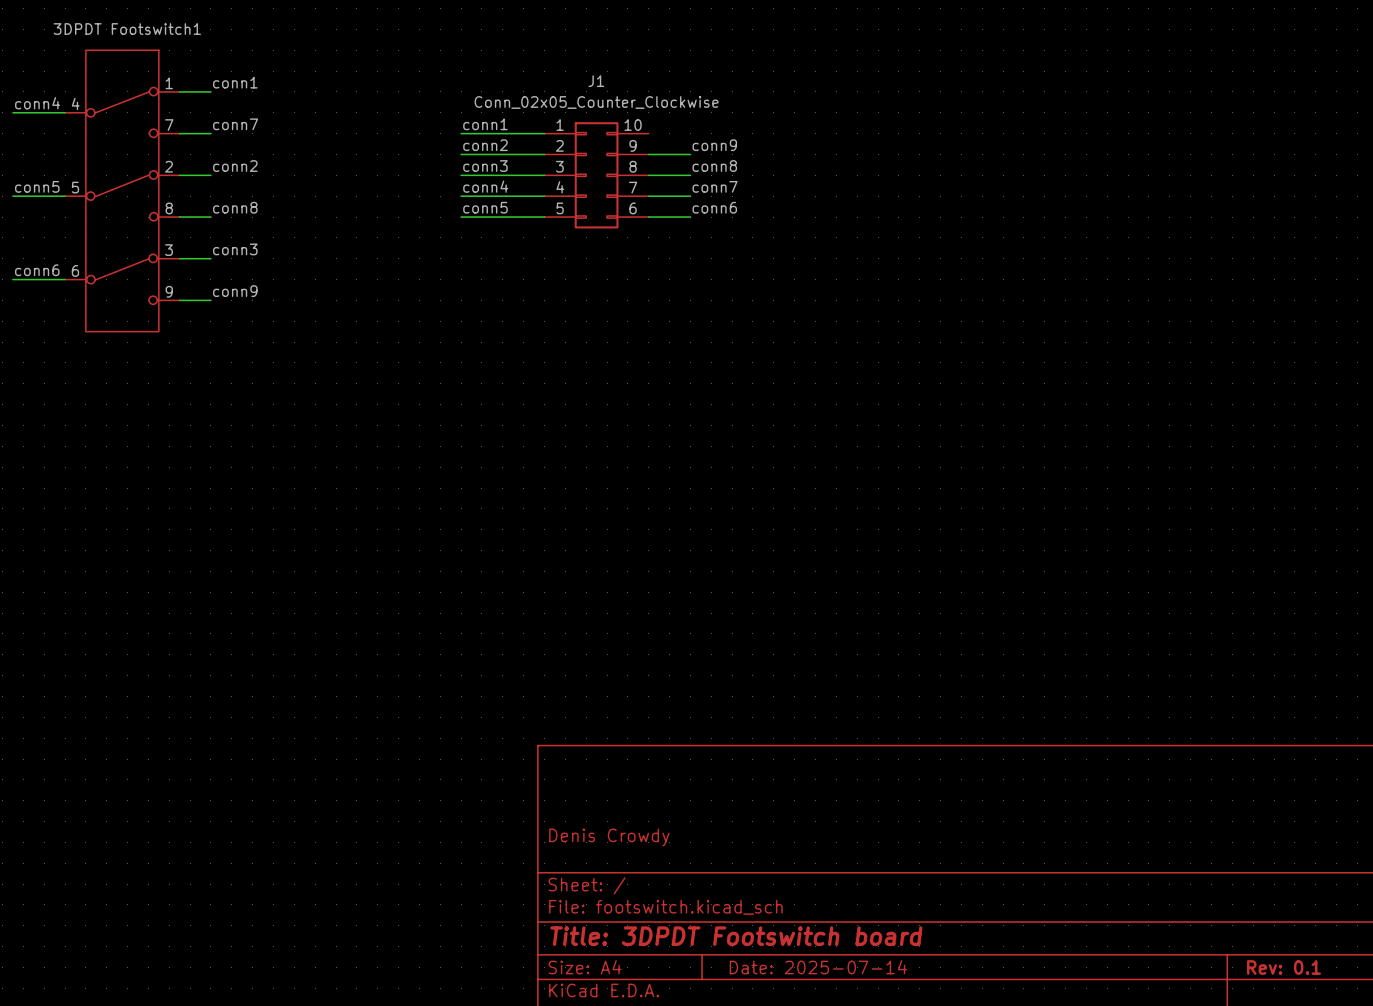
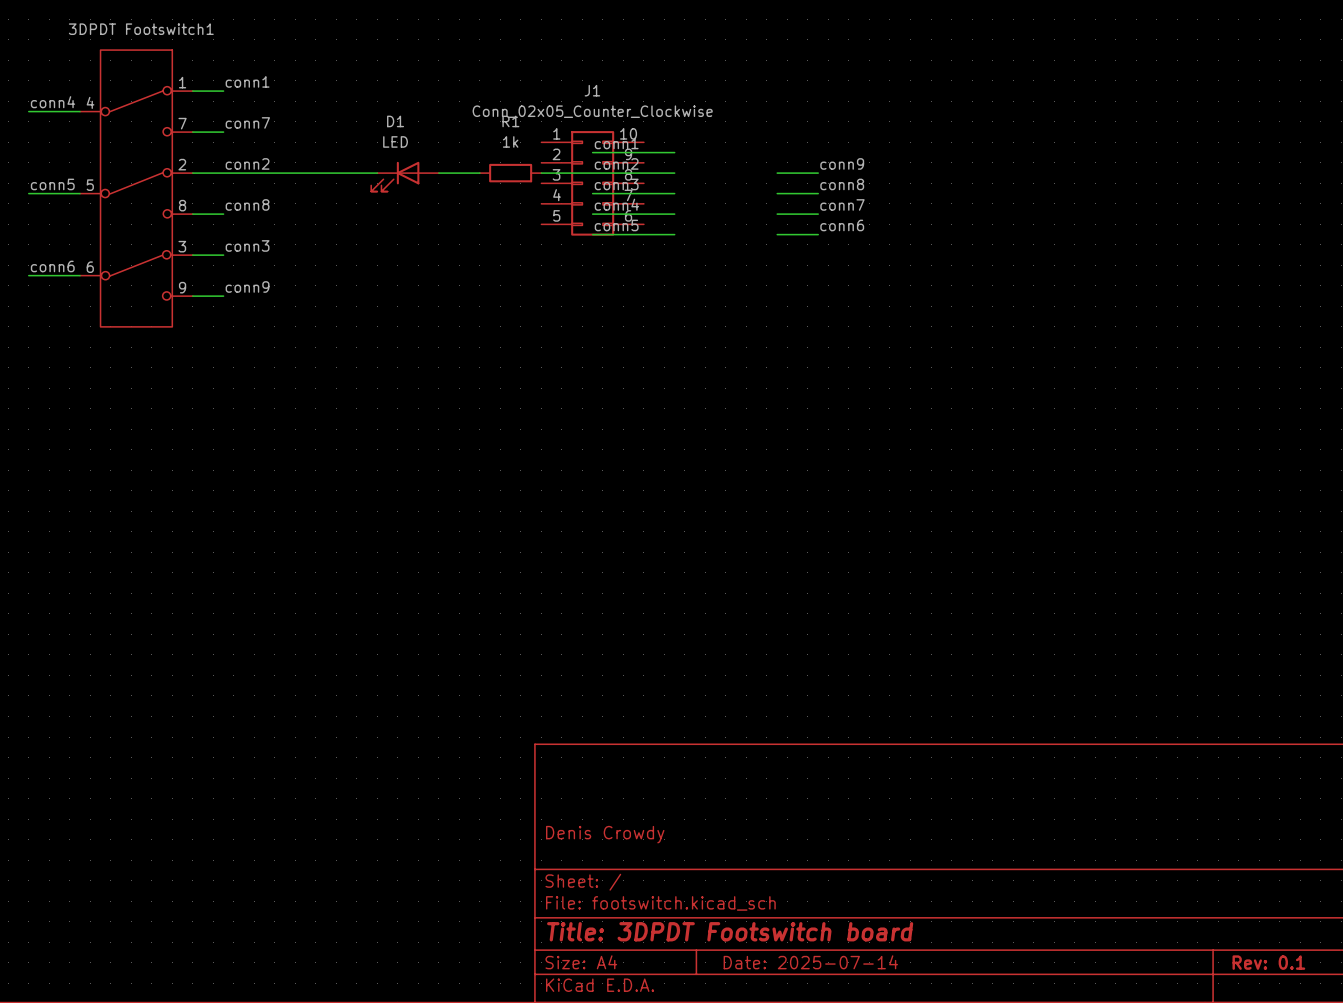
label position: conn1 (235, 82) -> conn1 (247, 81)
wire: (179, 91) (210, 91) -> (192, 91) (223, 91)
label position: conn4 (37, 103) -> conn4 (53, 102)
wire: (12, 112) (65, 112) -> (28, 111) (80, 111)
label position: conn7 (235, 124) -> conn7 (247, 122)
label: conn1 (485, 124) -> none
wire: (179, 133) (210, 133) -> (192, 132) (223, 132)
wire: (461, 133) (544, 133) -> (592, 152) (674, 152)
label: none -> conn1 (616, 143)
label: conn2 (485, 145) -> none
label position: conn9 (714, 145) -> conn9 (842, 163)
wire: (461, 154) (544, 154) -> none
wire: (648, 154) (690, 154) -> (777, 173) (818, 173)
label: none -> conn2 (616, 163)
wire: none -> (192, 173) (377, 173)
wire: none -> (438, 173) (479, 173)
R1: none -> 1k (510, 173)
wire: none -> (541, 173) (674, 173)
label position: conn2 (235, 166) -> conn2 (247, 163)
label: conn3 (485, 166) -> none
label position: conn8 (714, 166) -> conn8 (842, 184)
D1: none -> LED (405, 176)
wire: (179, 175) (210, 175) -> none
wire: (461, 175) (544, 175) -> (592, 193) (674, 193)
wire: (648, 175) (690, 175) -> (777, 193) (818, 193)
label: none -> conn3 (616, 184)
label position: conn5 (37, 186) -> conn5 (52, 184)
label position: conn4 (485, 186) -> conn4 (616, 204)
label position: conn7 (715, 186) -> conn7 (842, 204)
3DPDT Footswitch1 position: (122, 190) -> (136, 188)
wire: (12, 196) (65, 196) -> (28, 193) (80, 193)
wire: (461, 196) (544, 196) -> (592, 214) (674, 214)
wire: (648, 196) (690, 196) -> (777, 214) (818, 214)
label position: conn8 (235, 207) -> conn8 (247, 204)
label position: conn5 (485, 207) -> conn5 (616, 225)
label position: conn6 (714, 207) -> conn6 (842, 225)
wire: (179, 217) (210, 217) -> (192, 214) (223, 214)
wire: (461, 217) (544, 217) -> (592, 234) (674, 234)
wire: (648, 217) (690, 217) -> (777, 234) (818, 234)
label position: conn3 (235, 249) -> conn3 (247, 245)
wire: (179, 258) (210, 258) -> (192, 255) (223, 255)
label position: conn6 (37, 270) -> conn6 (52, 266)
wire: (12, 279) (65, 279) -> (28, 275) (80, 275)
label position: conn9 (235, 291) -> conn9 (247, 286)
wire: (179, 300) (210, 300) -> (192, 296) (223, 296)

